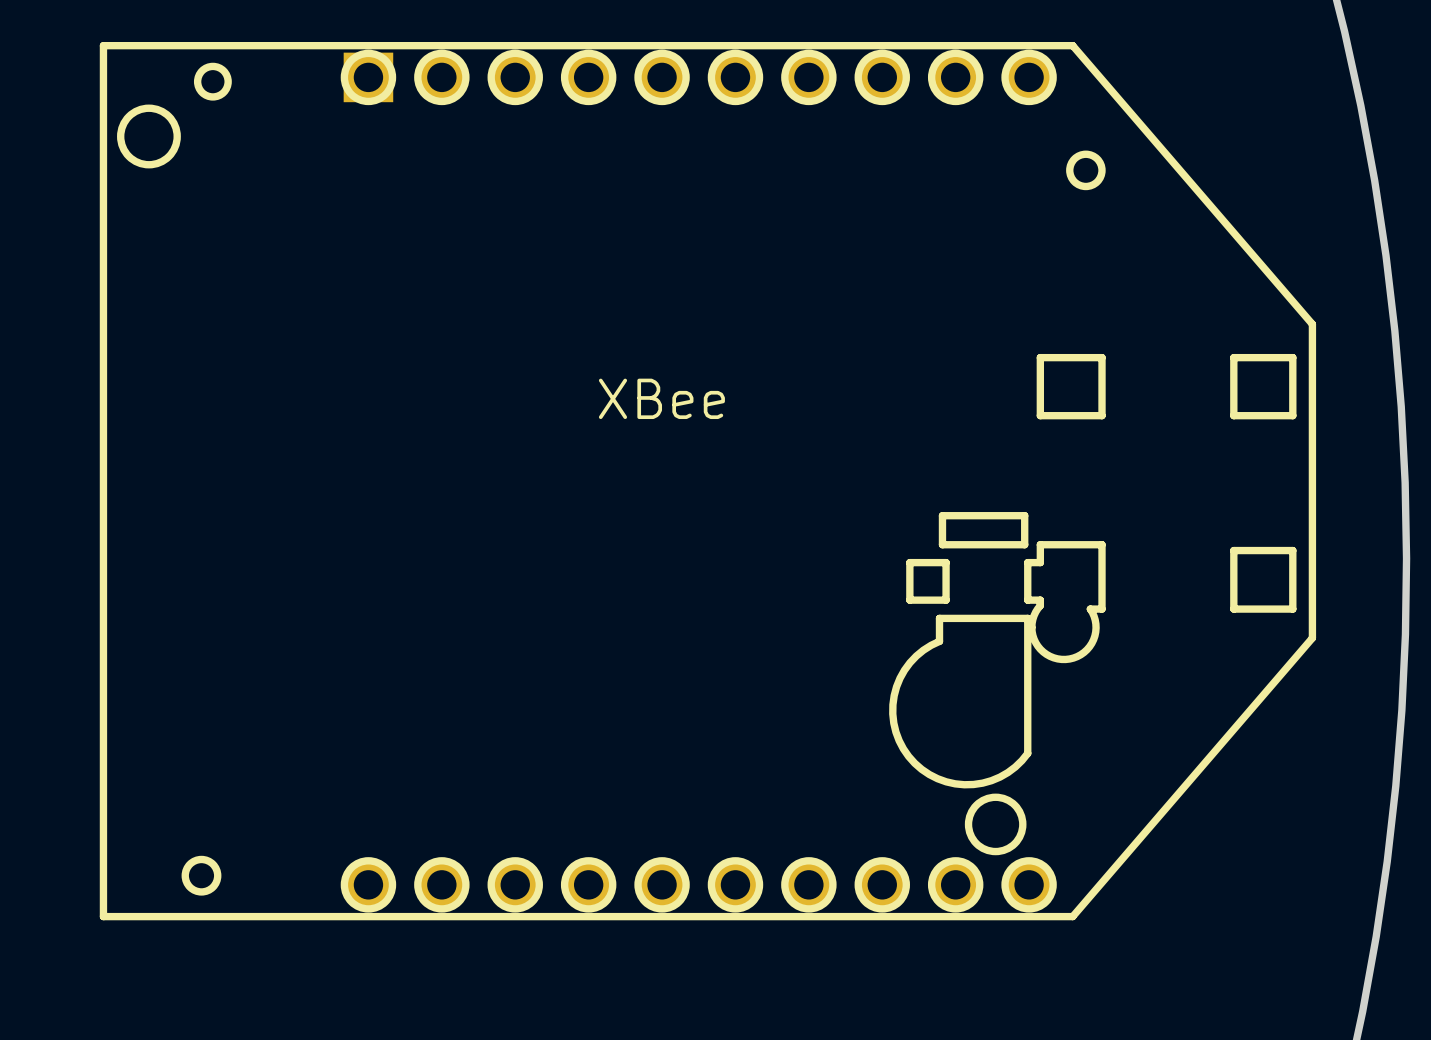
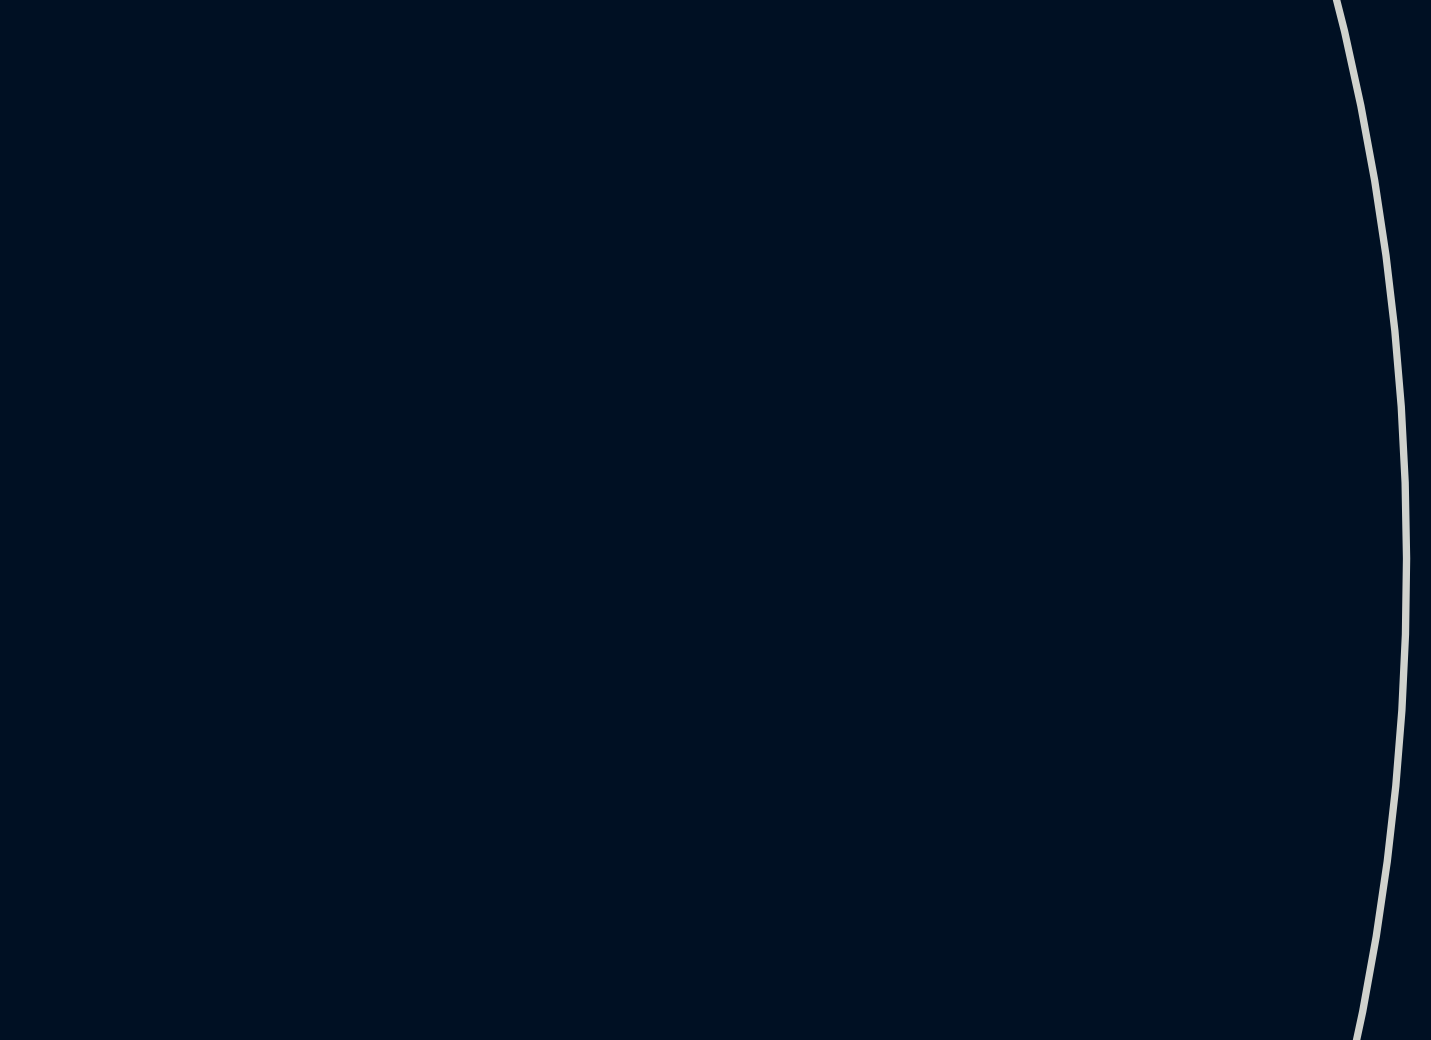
XBee: (707, 481) -> none

